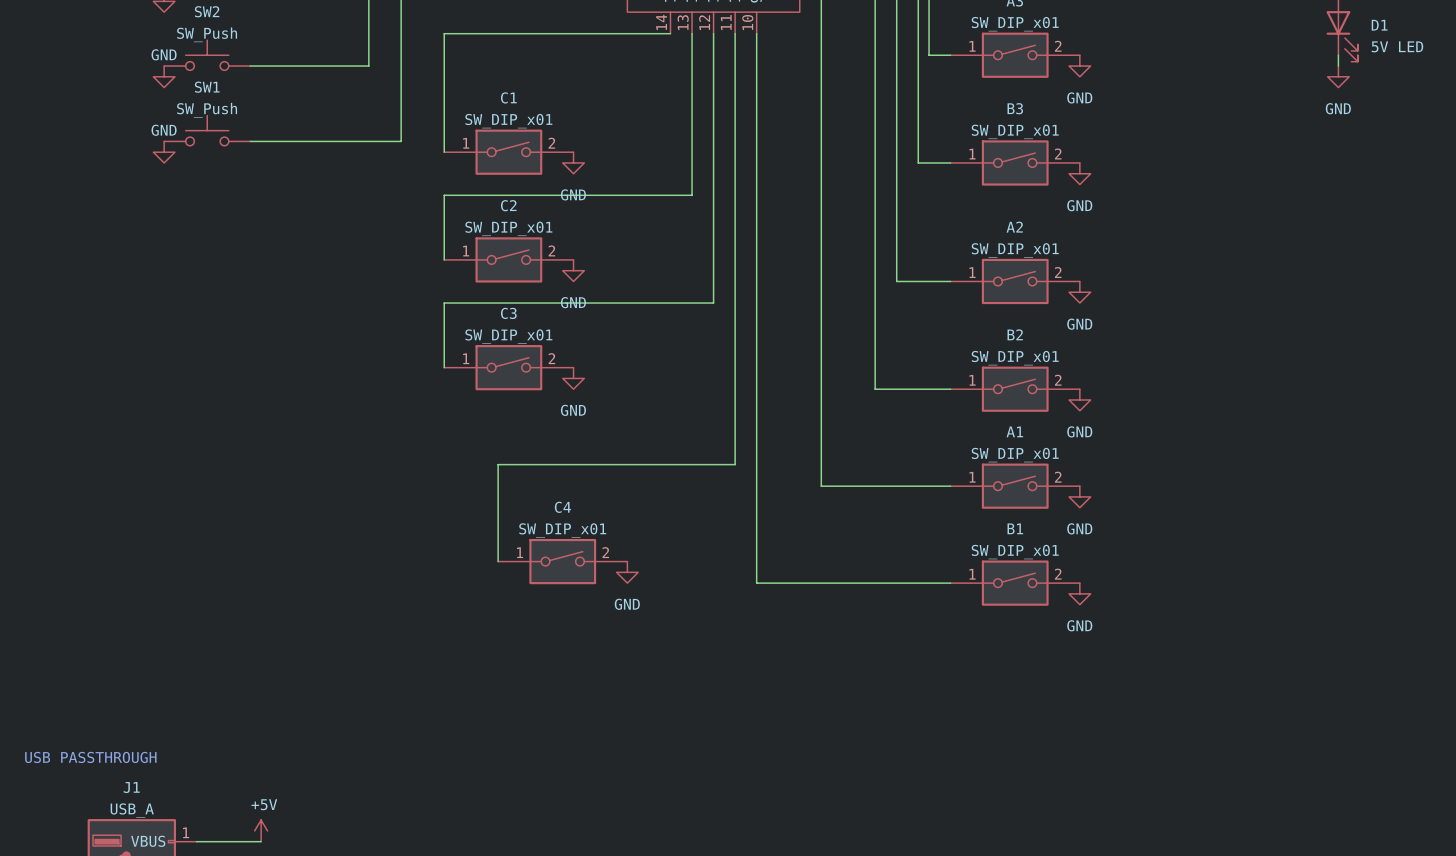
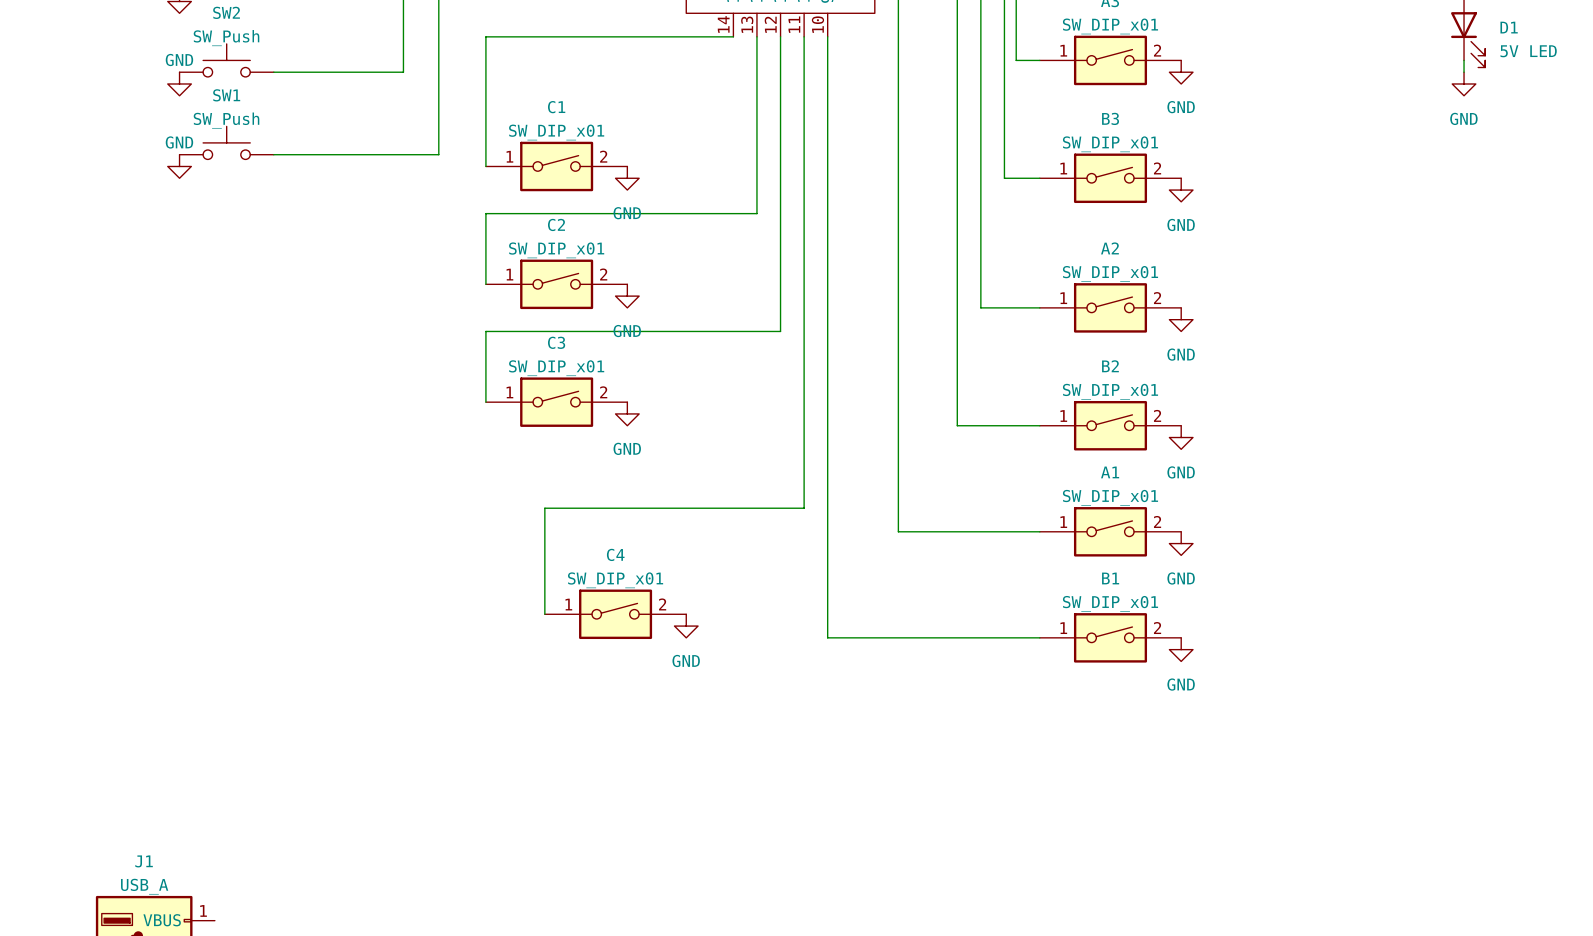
text: USB PASSTHROUGH (90, 757) -> none
power symbol: +5V (261, 830) -> none
wire: (196, 841) (261, 841) -> none

